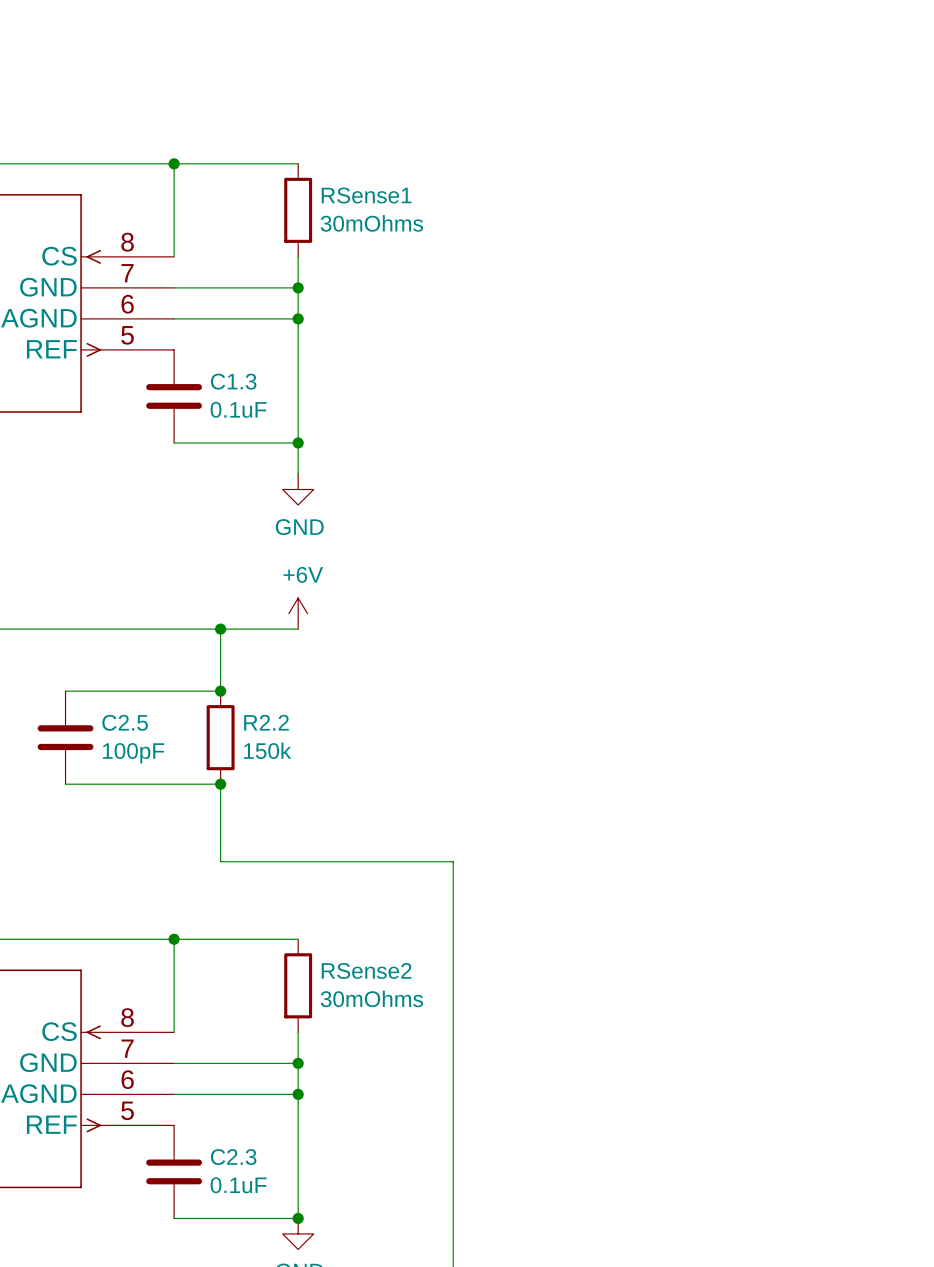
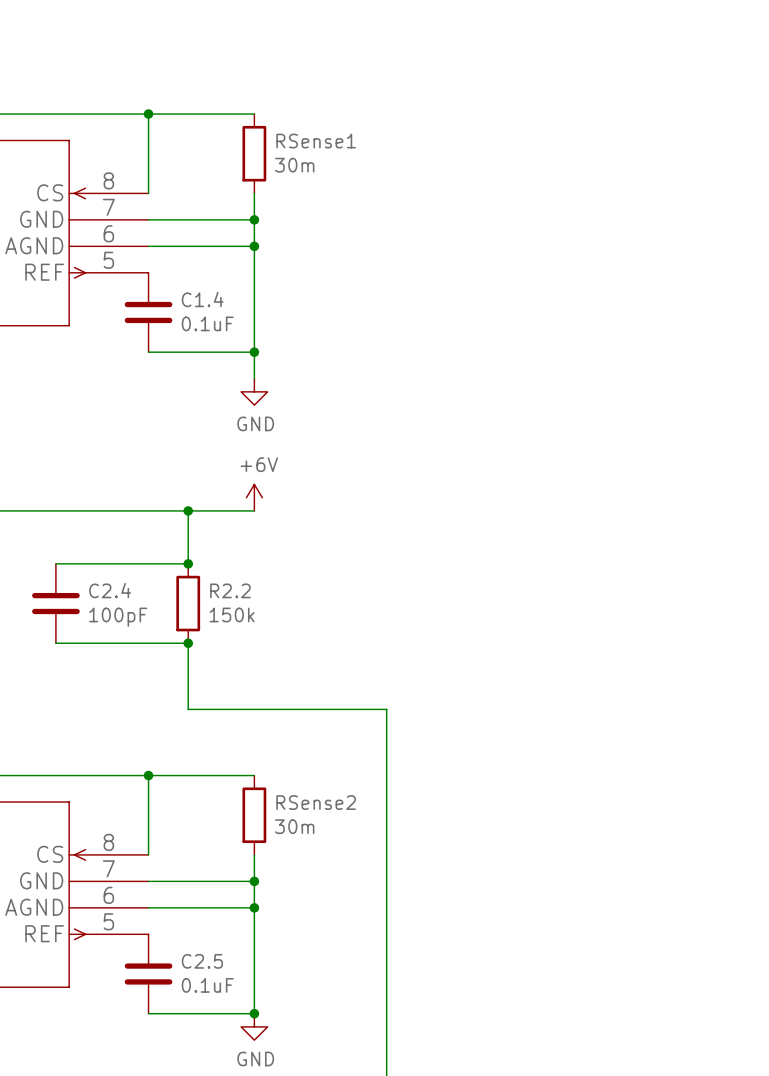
RSense1 value: 30mOhms (371, 223) -> 30m (294, 165)
C1.3 name: C1.3 (233, 381) -> C1.4 (202, 299)
C2.5 name: C2.5 (125, 722) -> C2.4 (110, 590)
RSense2 value: 30mOhms (371, 998) -> 30m (294, 826)
C2.3 name: C2.3 (233, 1157) -> C2.5 (202, 961)

